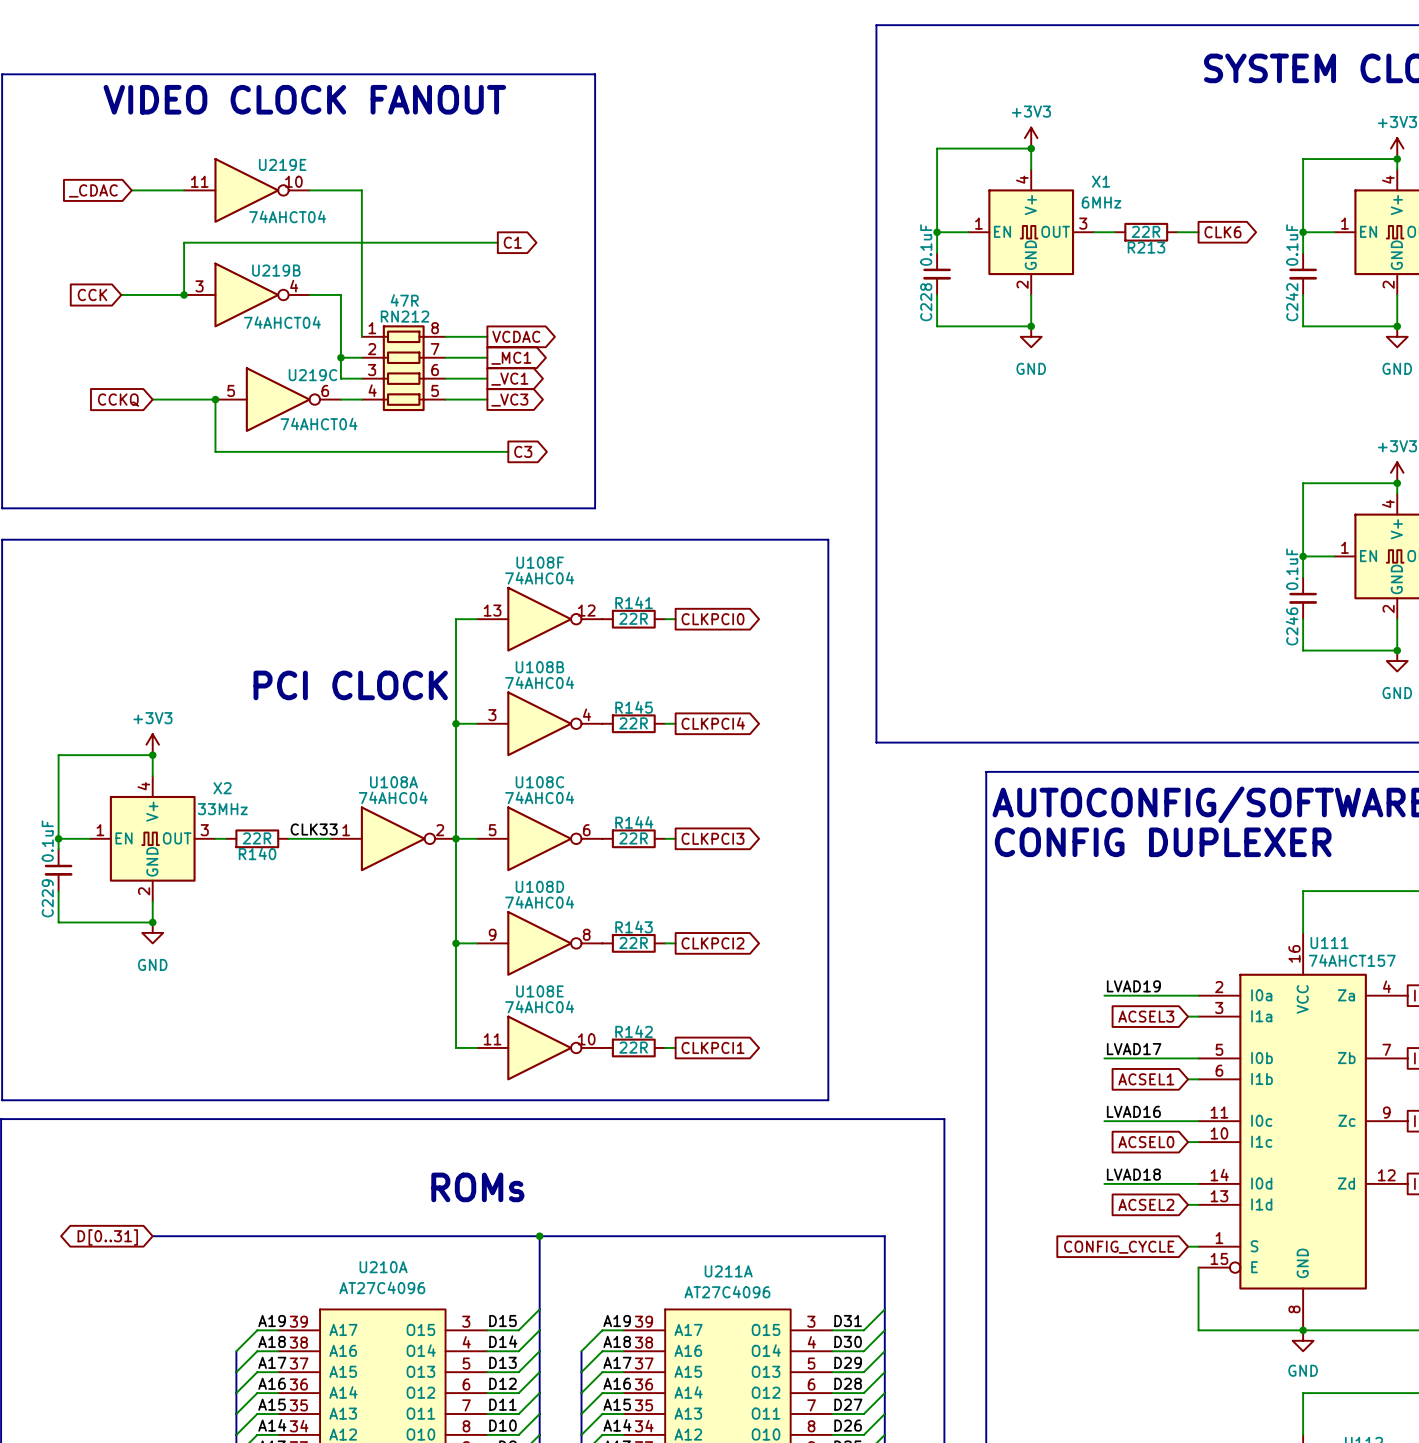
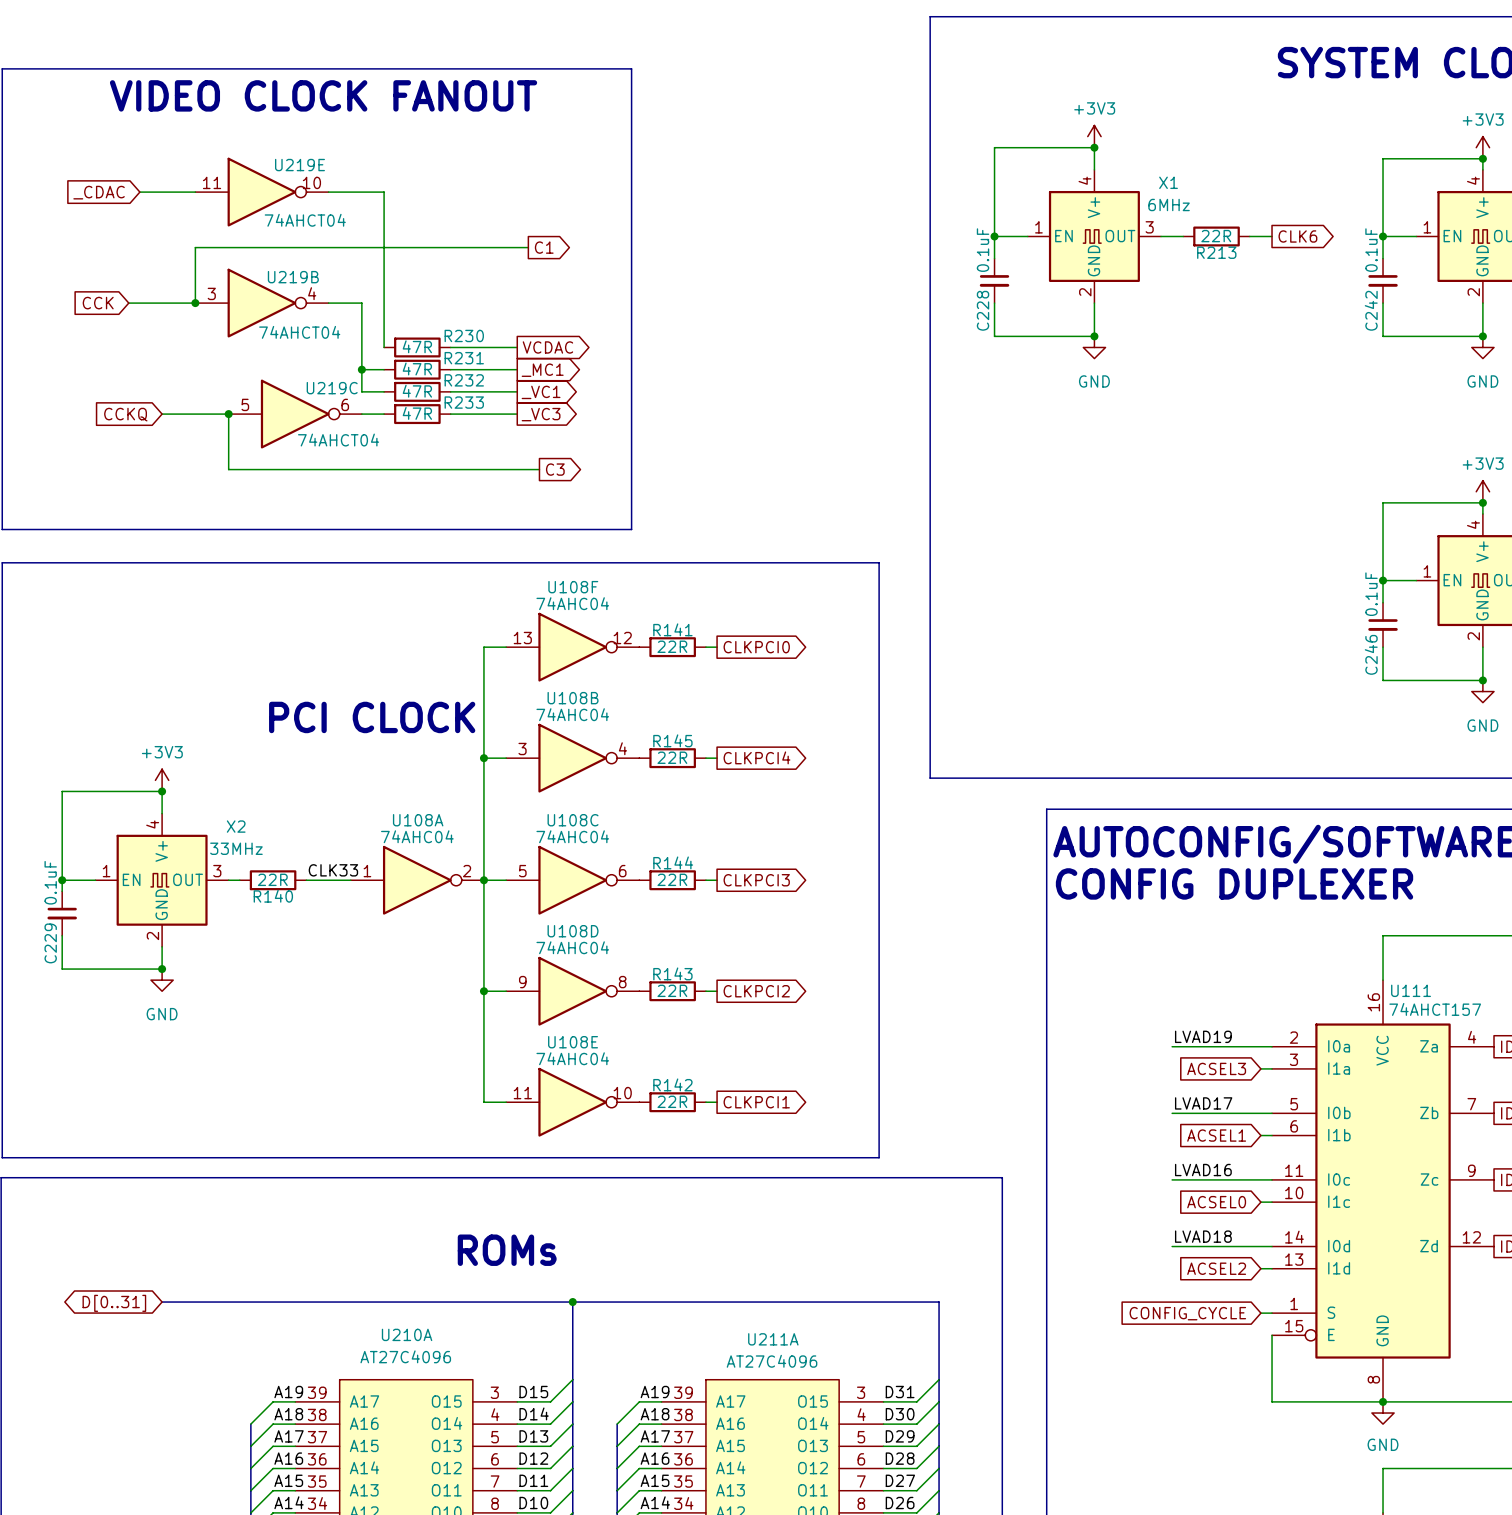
R230: none -> 47R (417, 347)
R231: none -> 47R (417, 369)
RN212: 47R (403, 368) -> none
R232: none -> 47R (417, 391)
R233: none -> 47R (417, 414)

